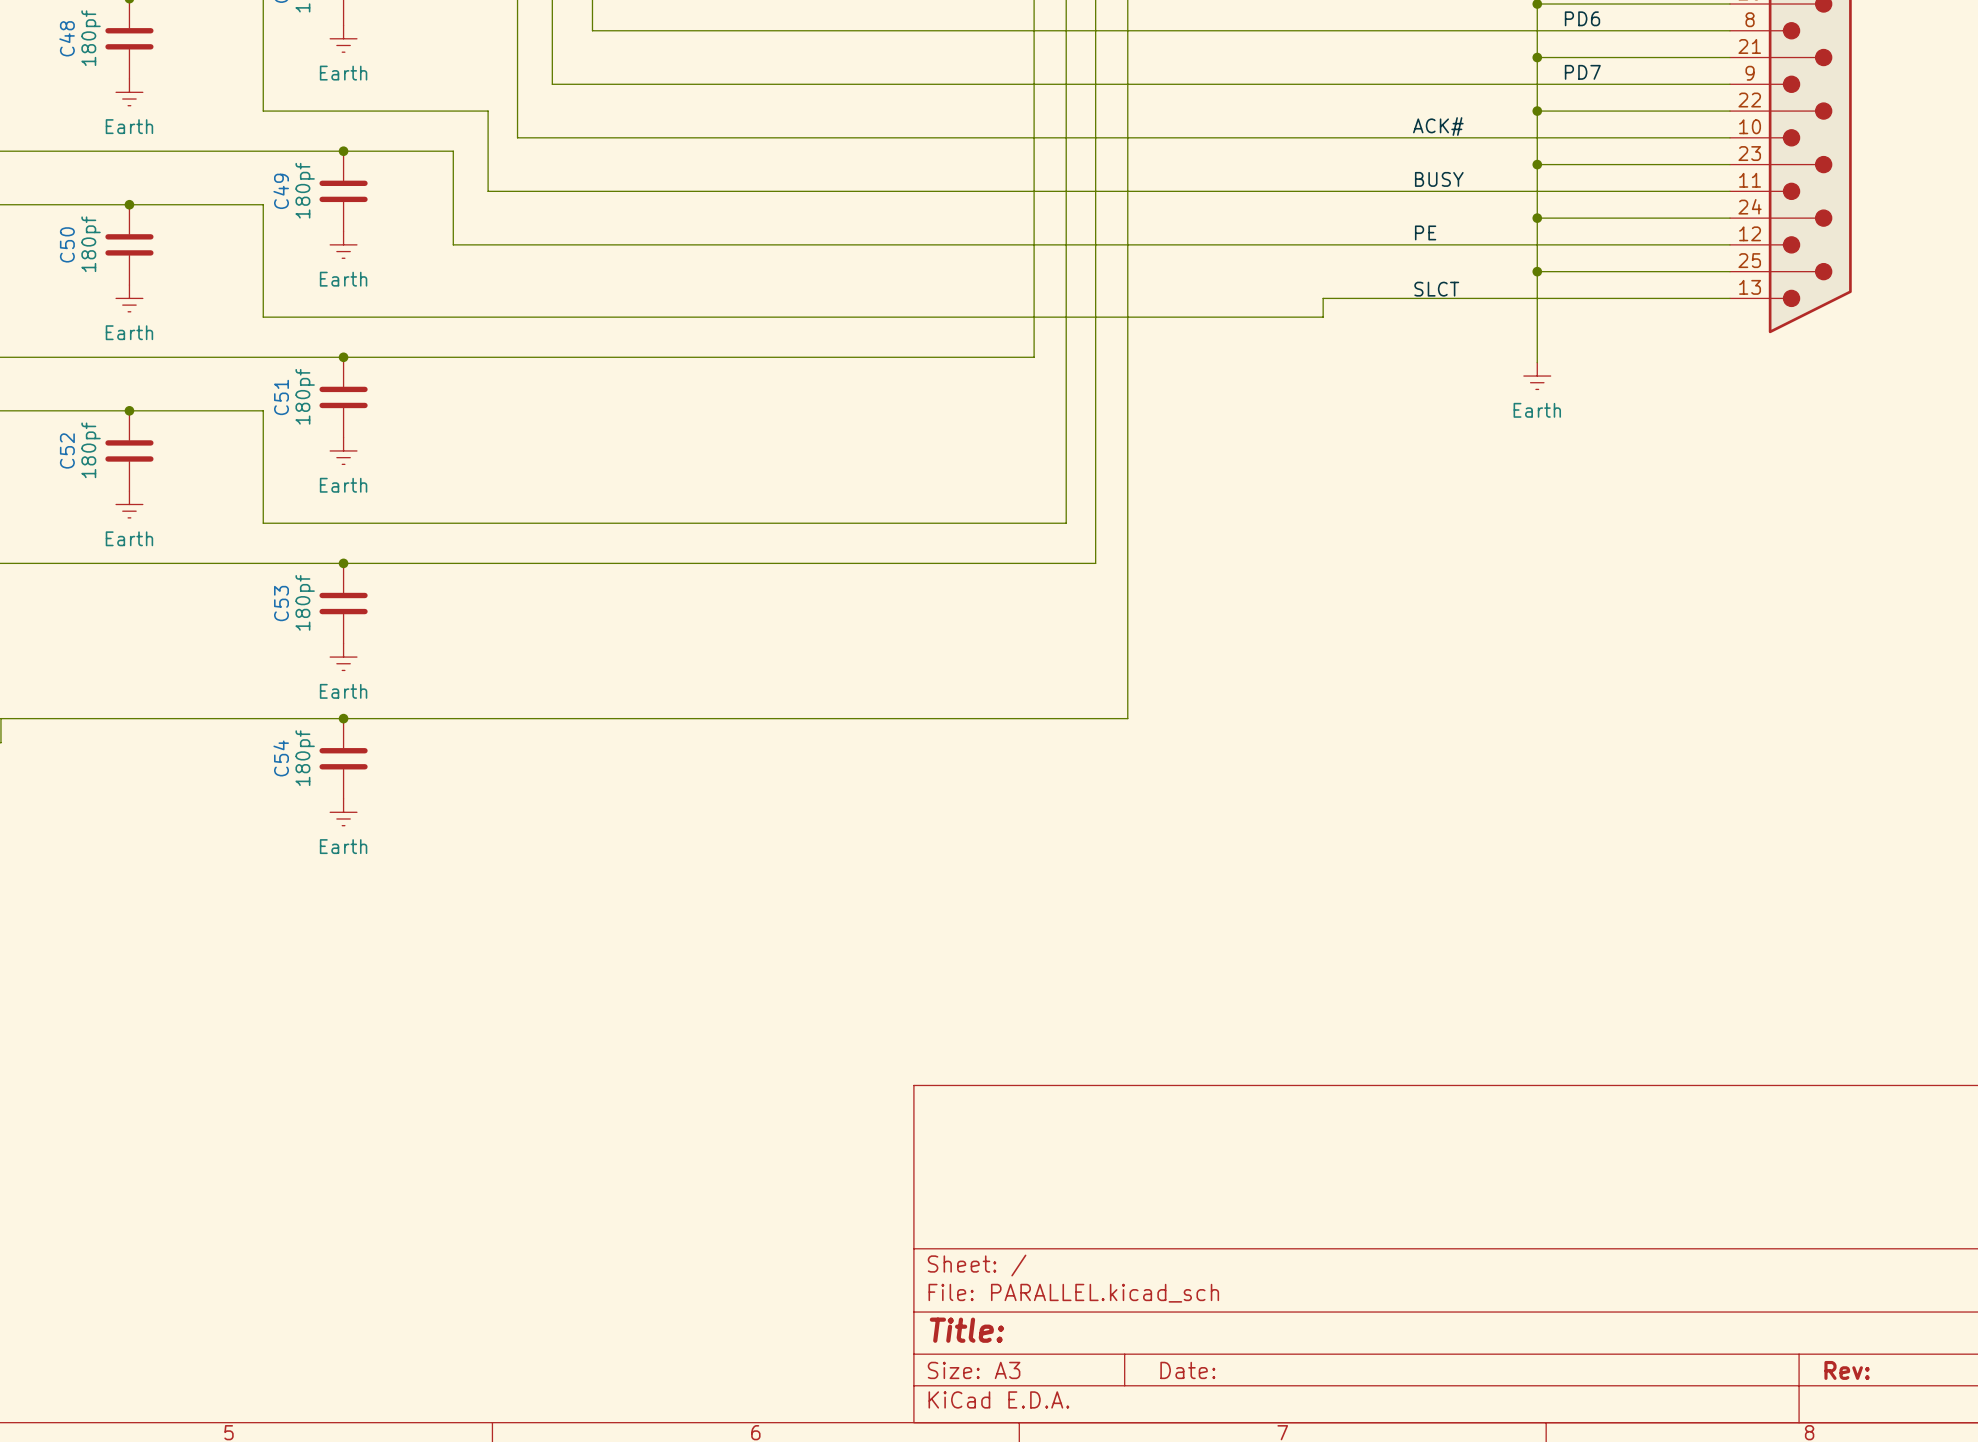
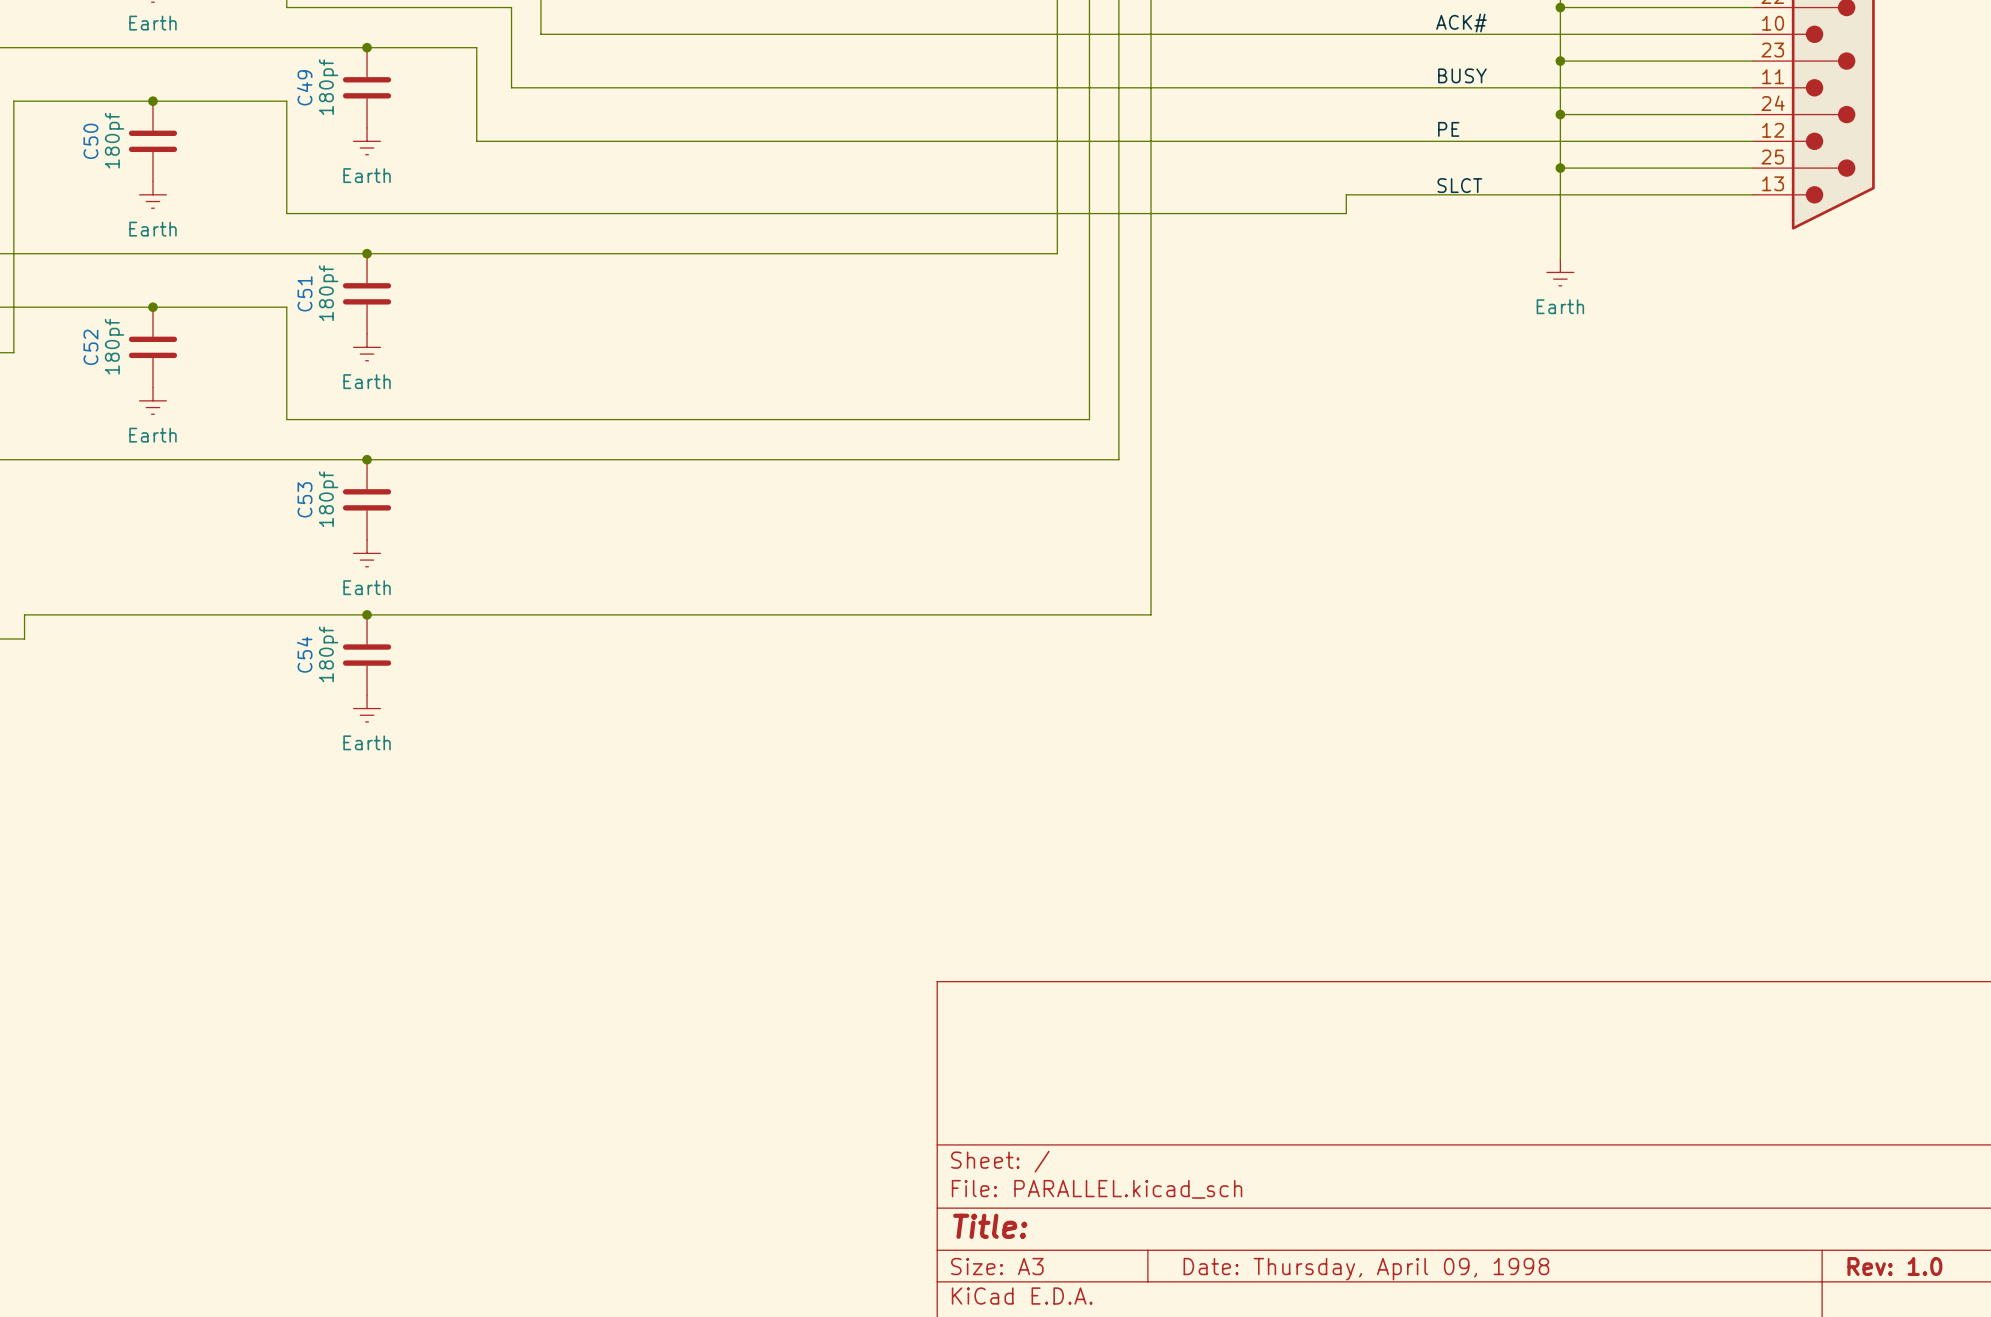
title block: Date: (1187, 1370) -> Date: Thursday, April 09, 1998 (1366, 1269)
title block: Rev: (1847, 1370) -> Rev: 1.0 (1894, 1266)

